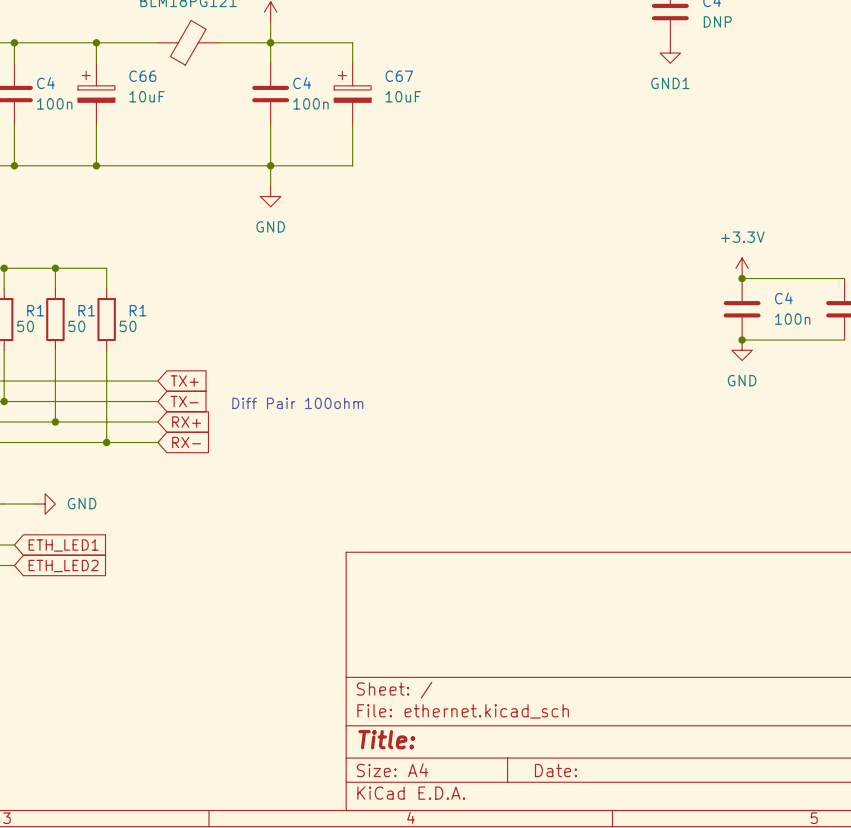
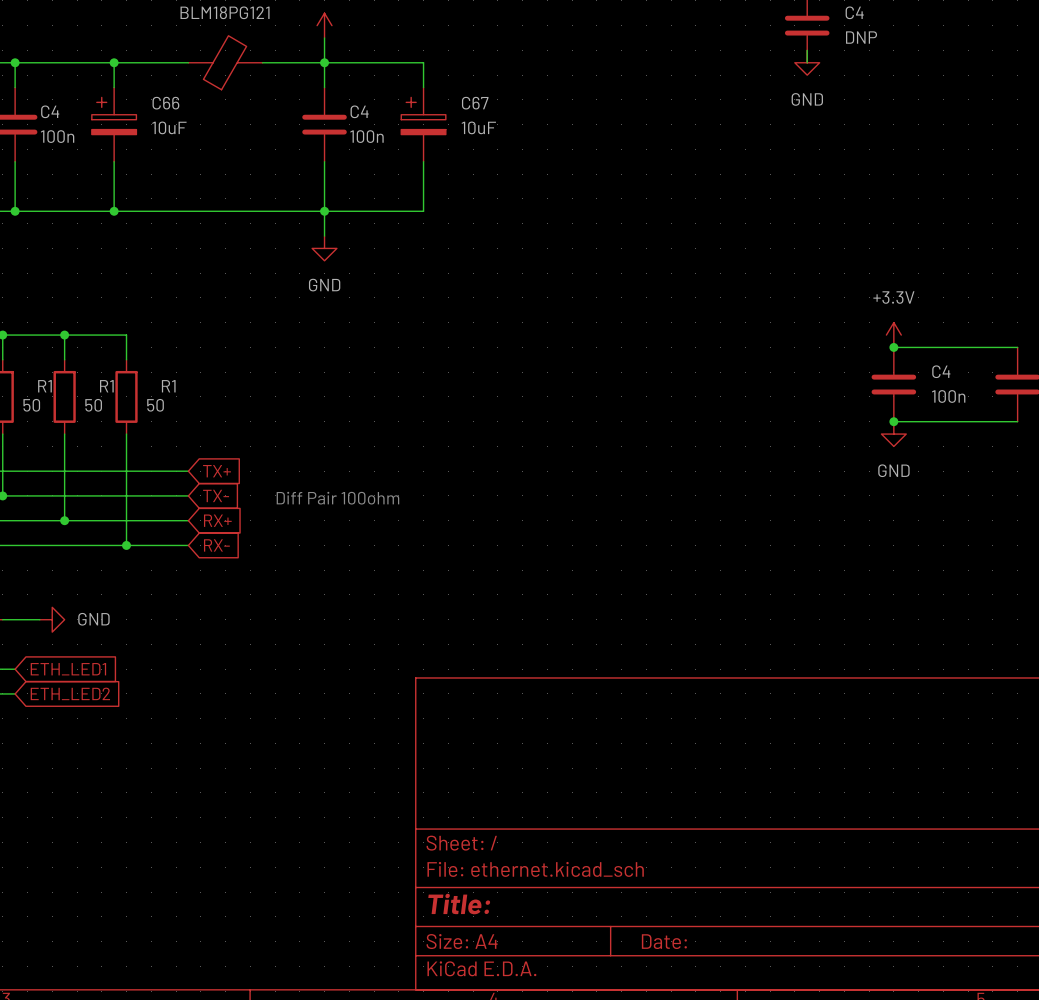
power symbol: none -> GND (807, 62)
power symbol: GND1 (670, 53) -> none

